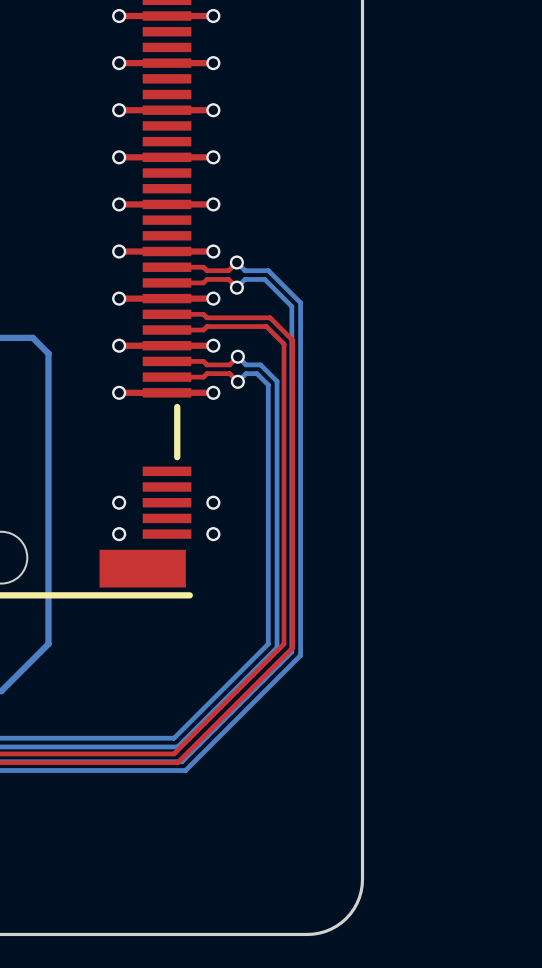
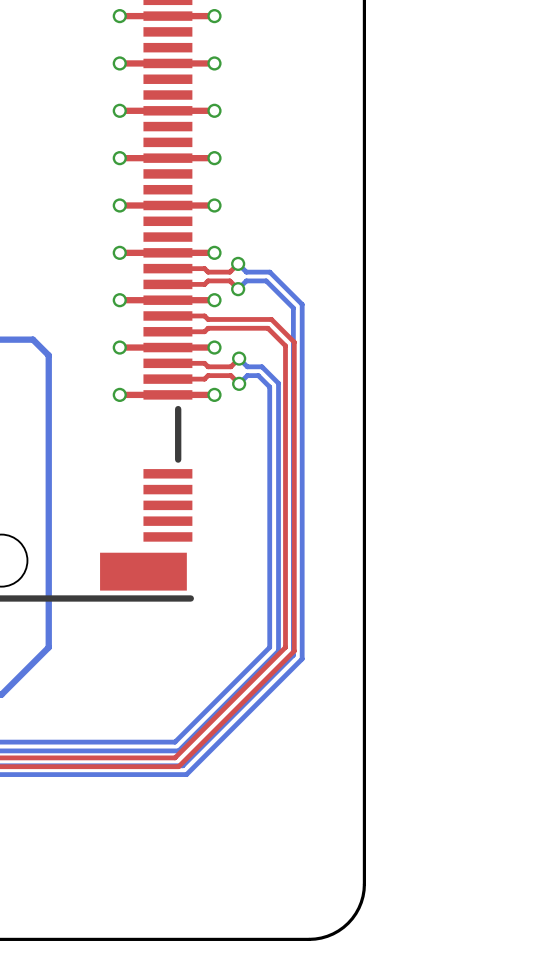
via: (119, 502) -> none
via: (213, 502) -> none
via: (119, 534) -> none
via: (213, 534) -> none

